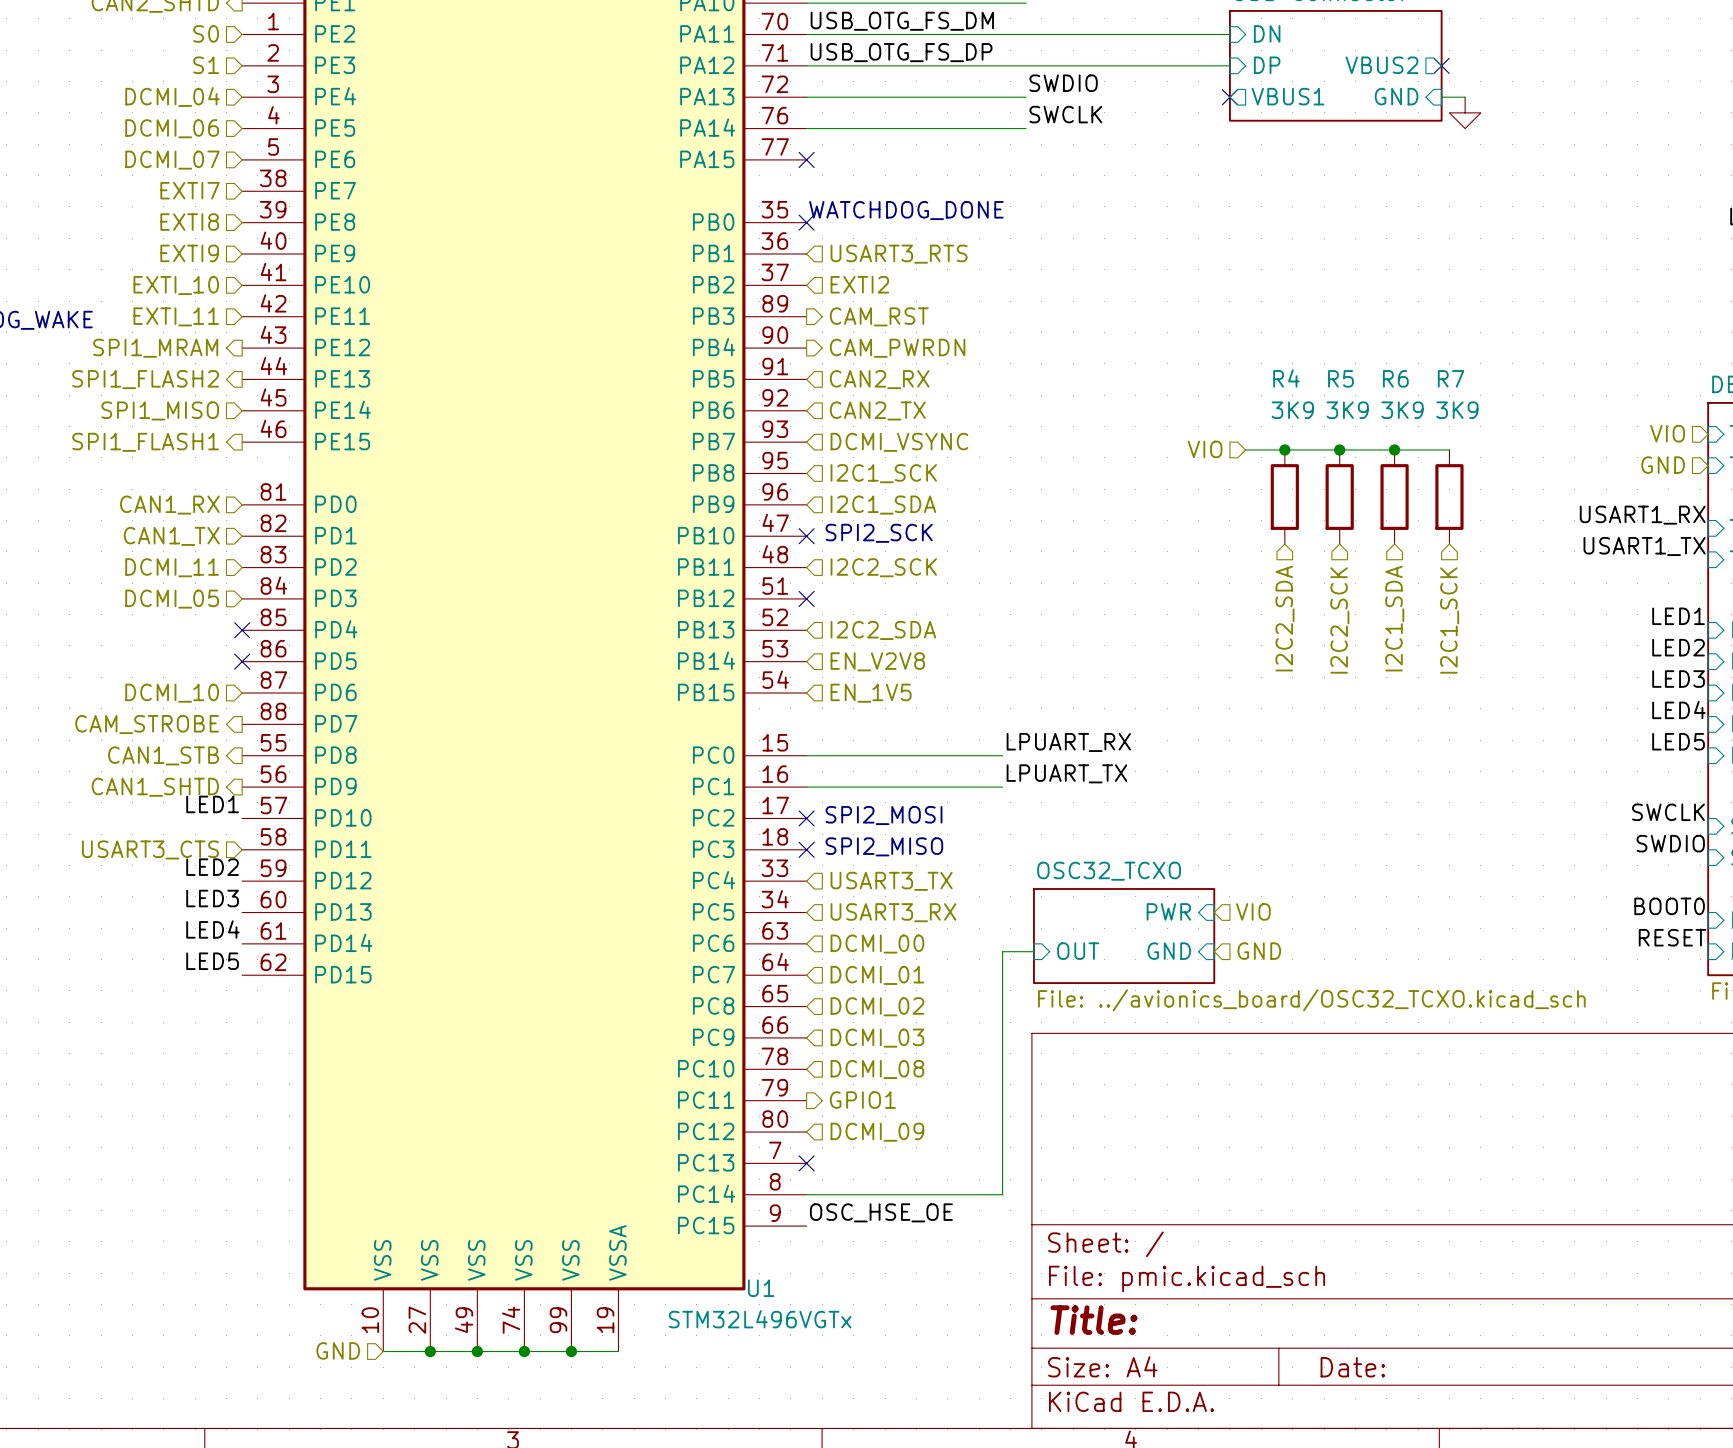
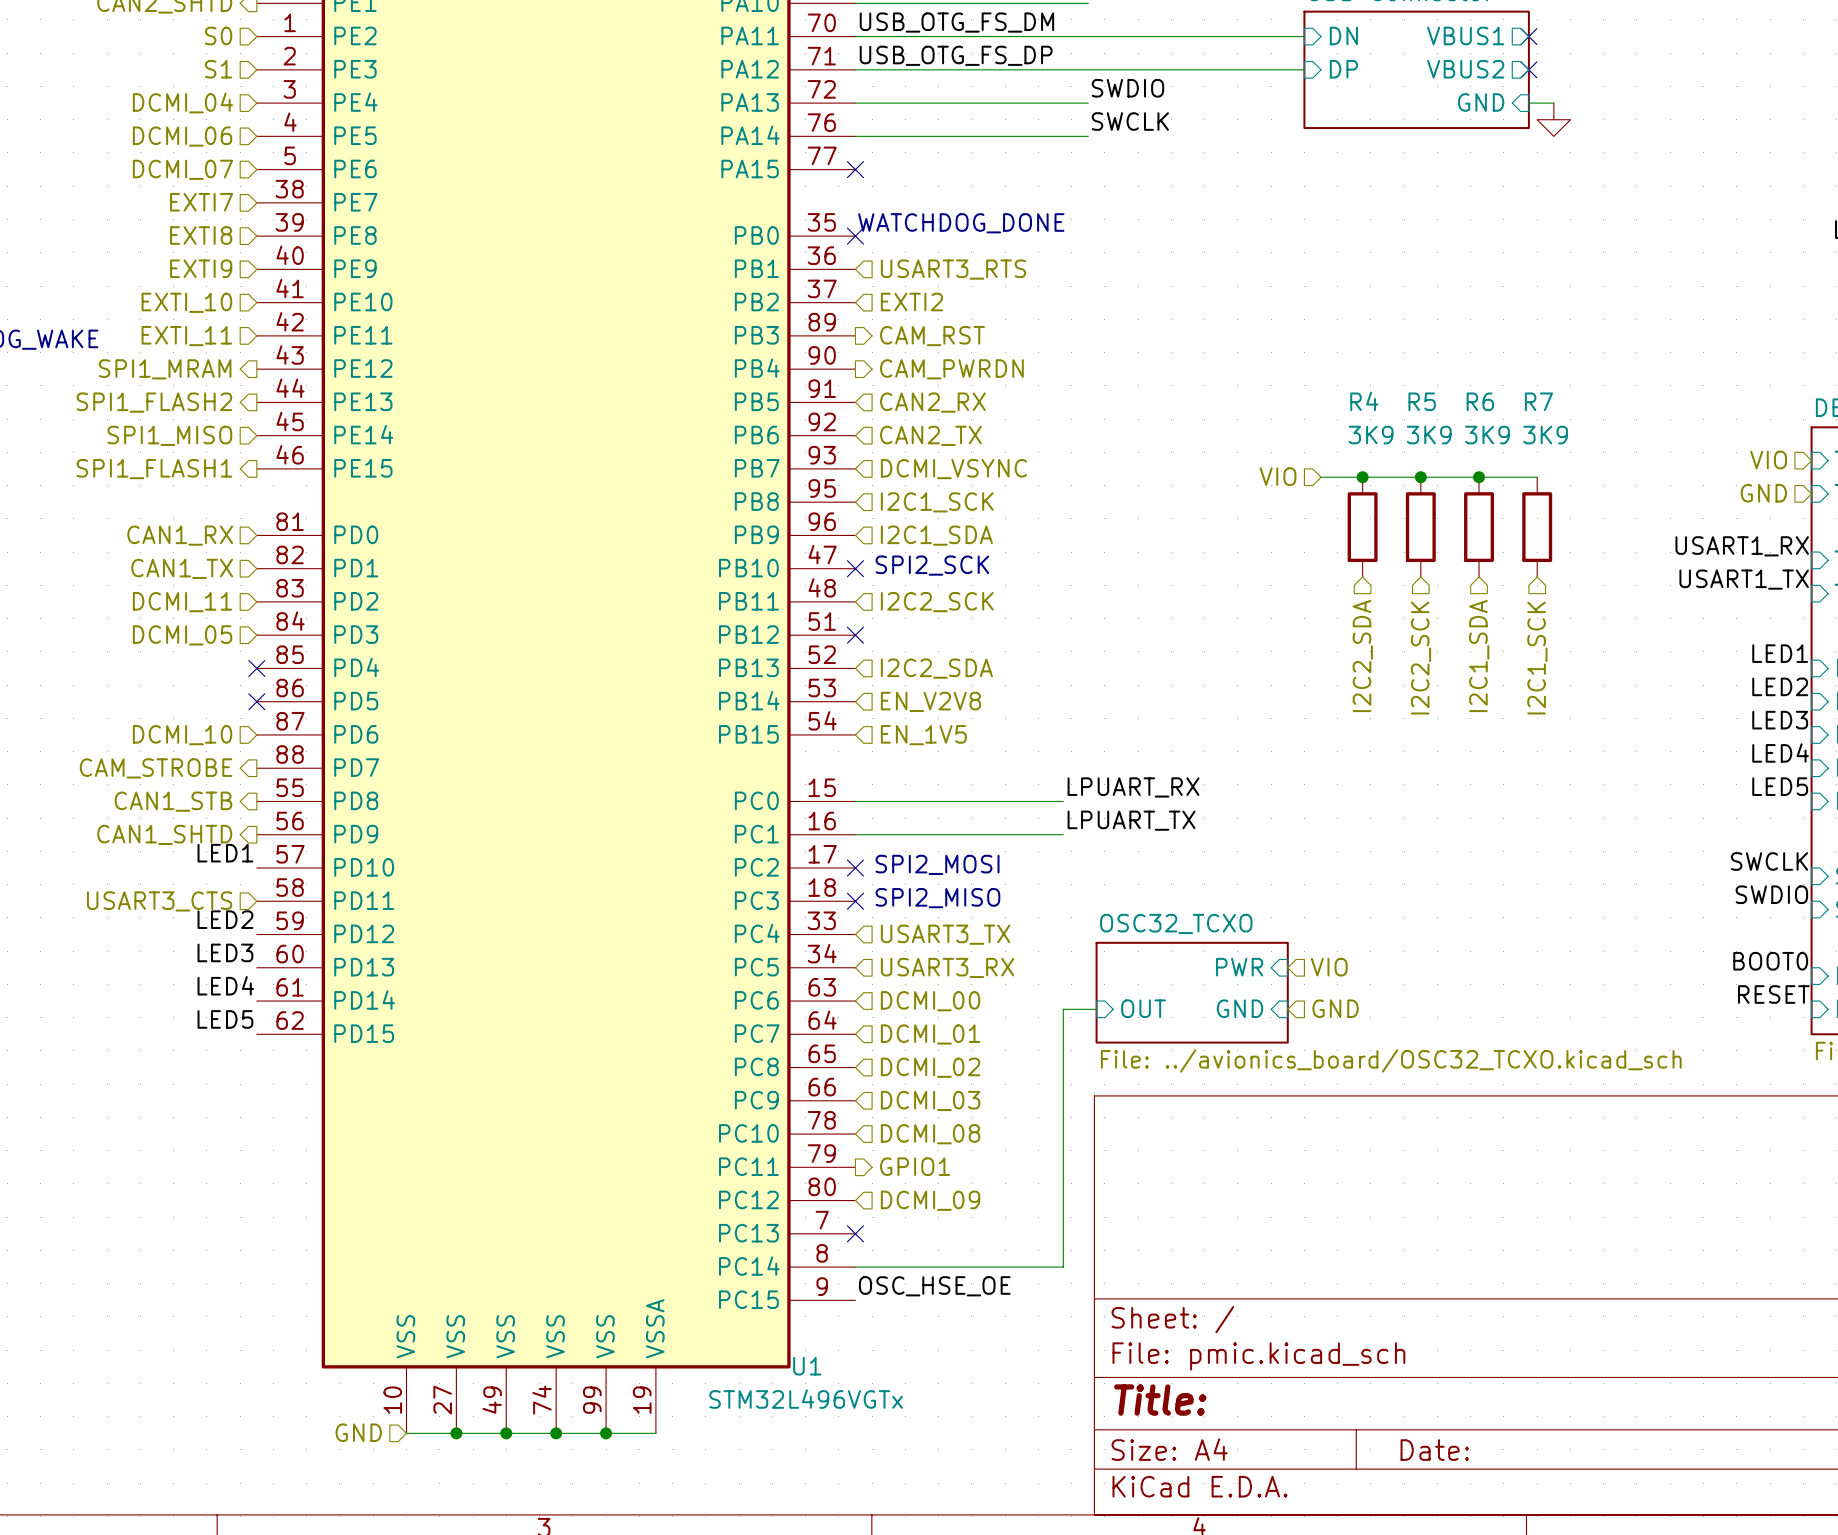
no-connect mark: none -> (1528, 36)
sheet pin rotation: 0° (1288, 96) -> 180° (1465, 35)
sheet pin position: VBUS1 (1288, 96) -> VBUS1 (1465, 35)
no-connect mark: (1229, 97) -> none

